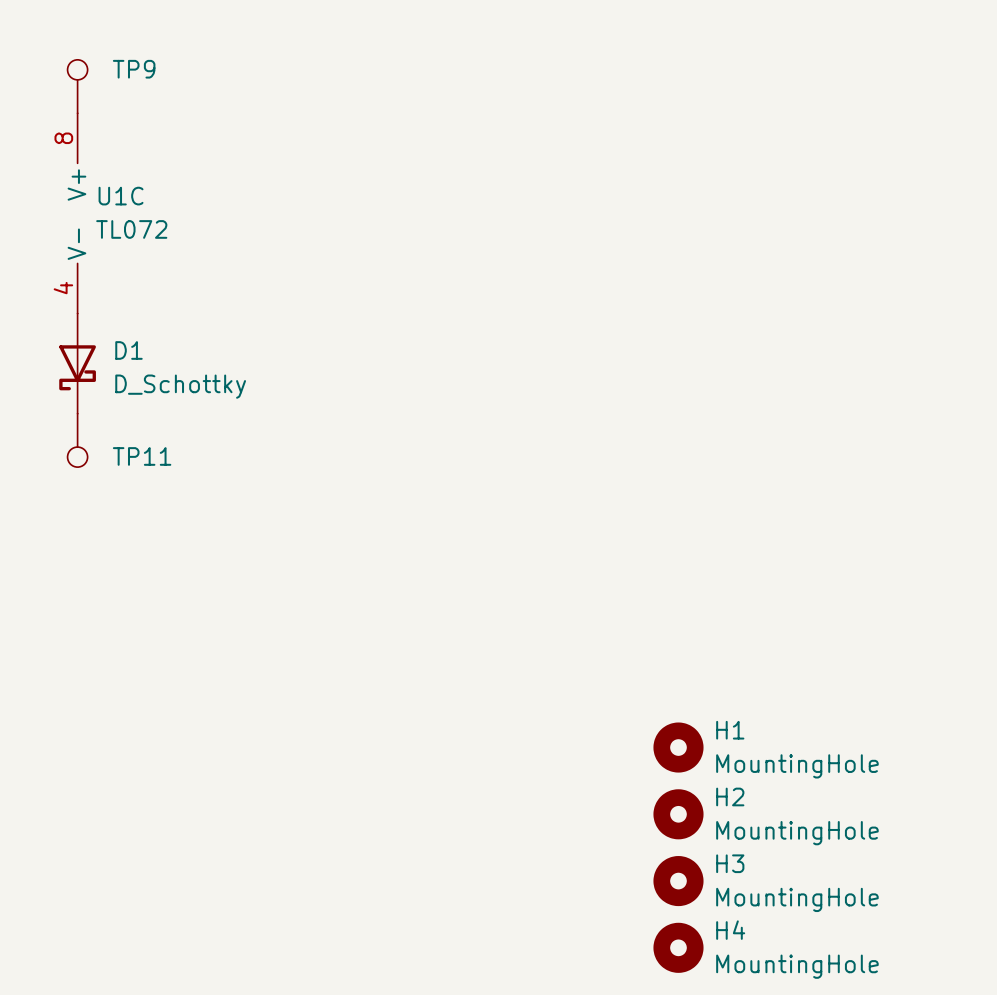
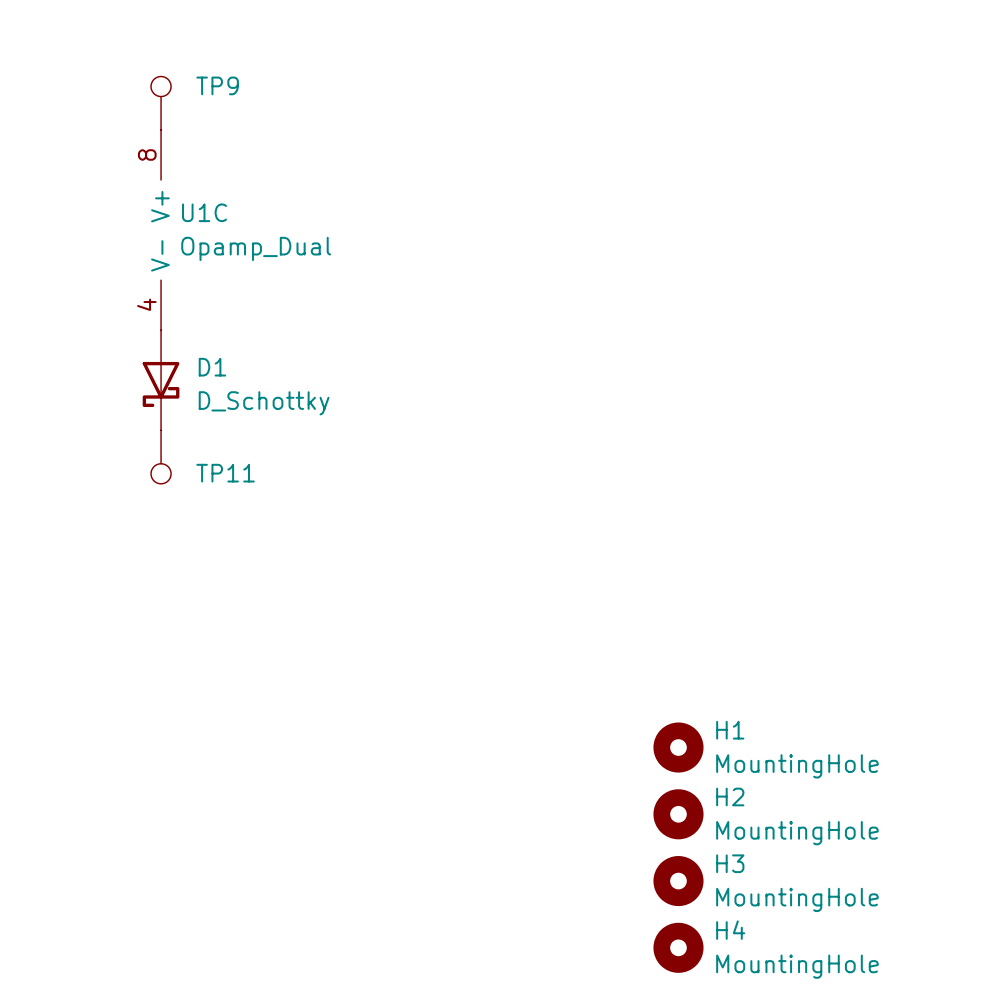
TP9 position: (77, 86) -> (161, 103)
U1C position: (77, 213) -> (161, 230)
U1C value: TL072 (131, 229) -> Opamp_Dual (256, 248)
D1 position: (77, 363) -> (161, 380)
TP11 position: (77, 440) -> (161, 457)

